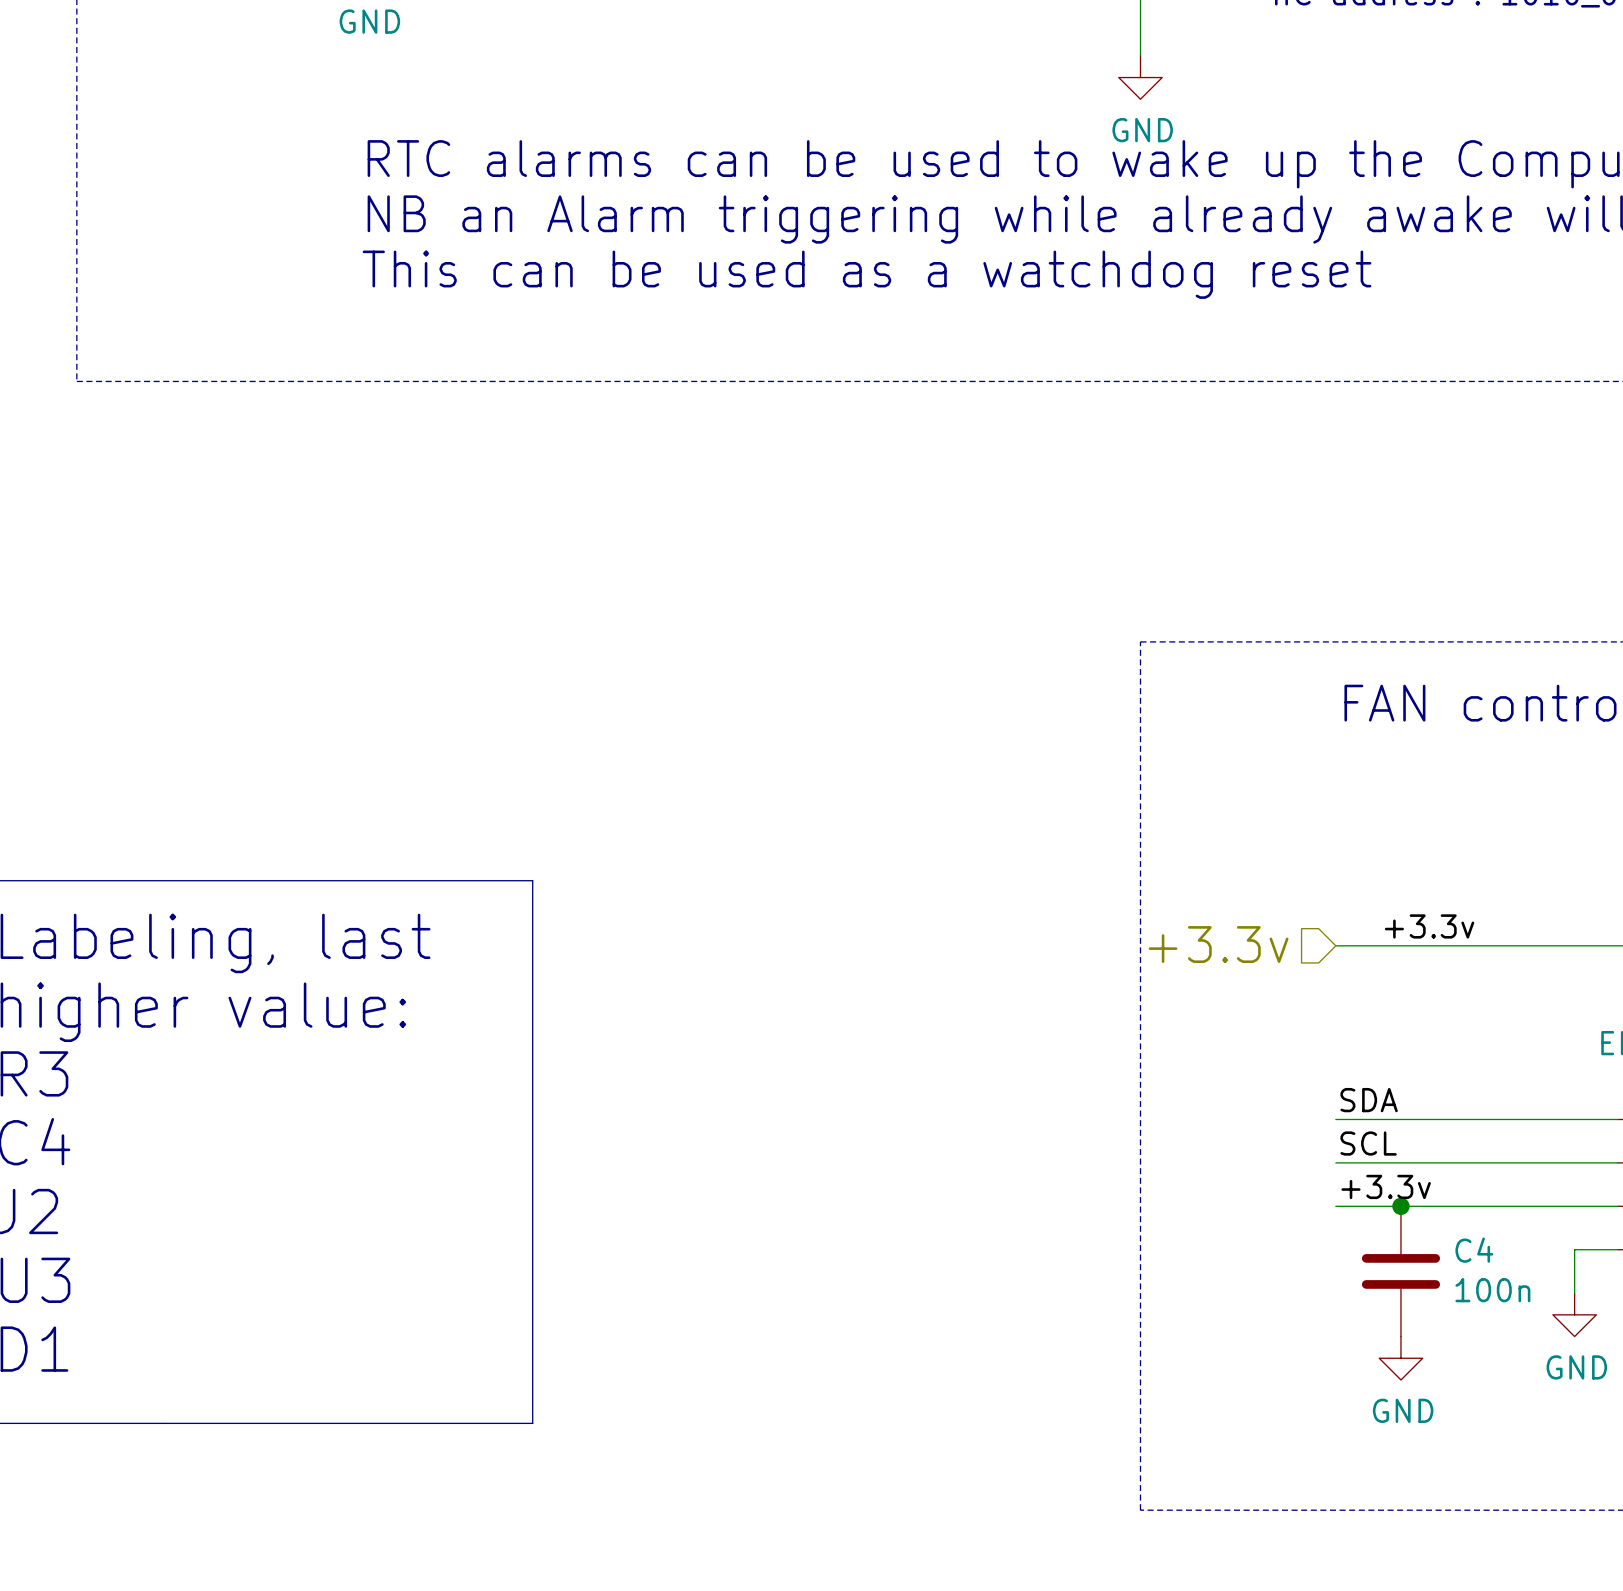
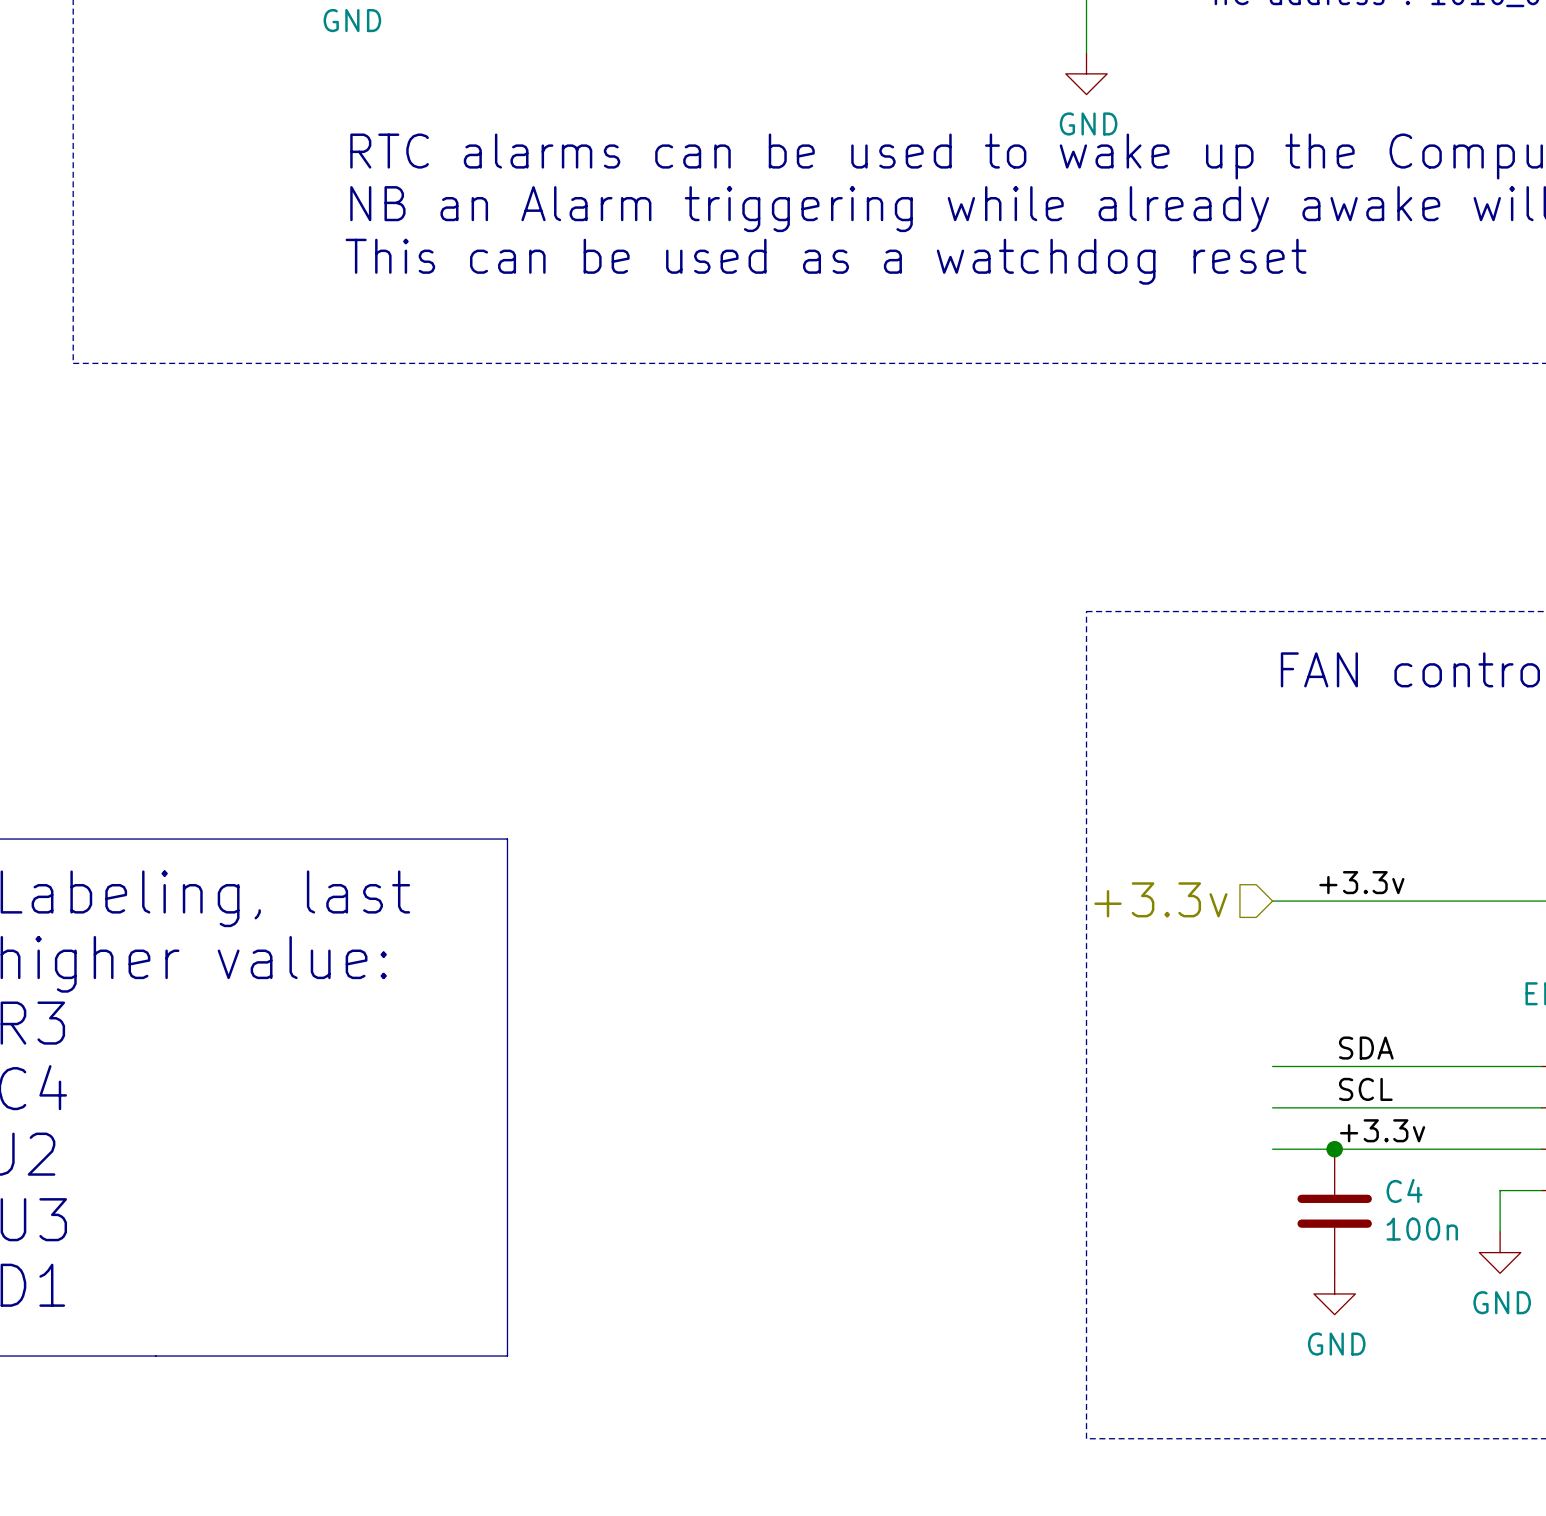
label position: SDA (1369, 1100) -> SDA (1366, 1048)
label position: SCL (1368, 1143) -> SCL (1365, 1089)
label position: +3.3v (1386, 1186) -> +3.3v (1382, 1130)

